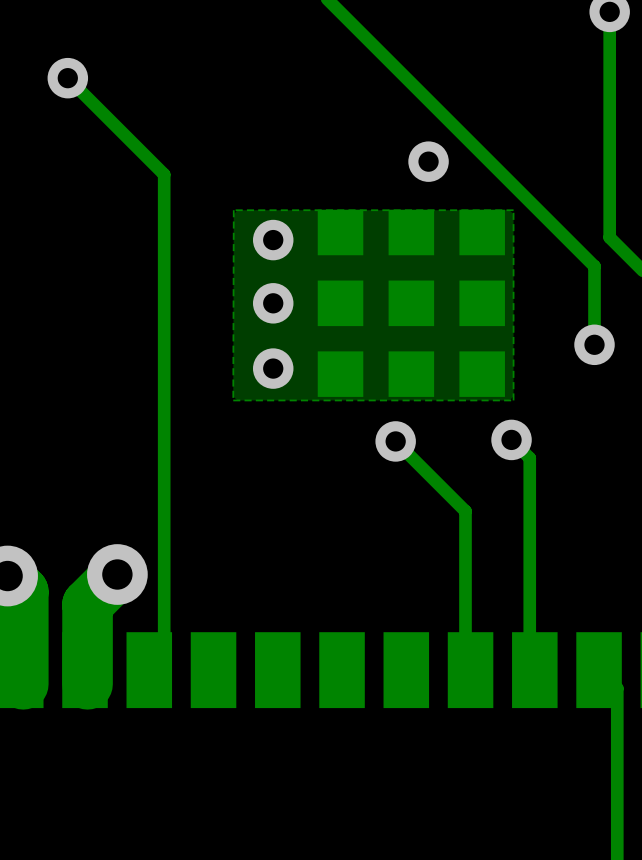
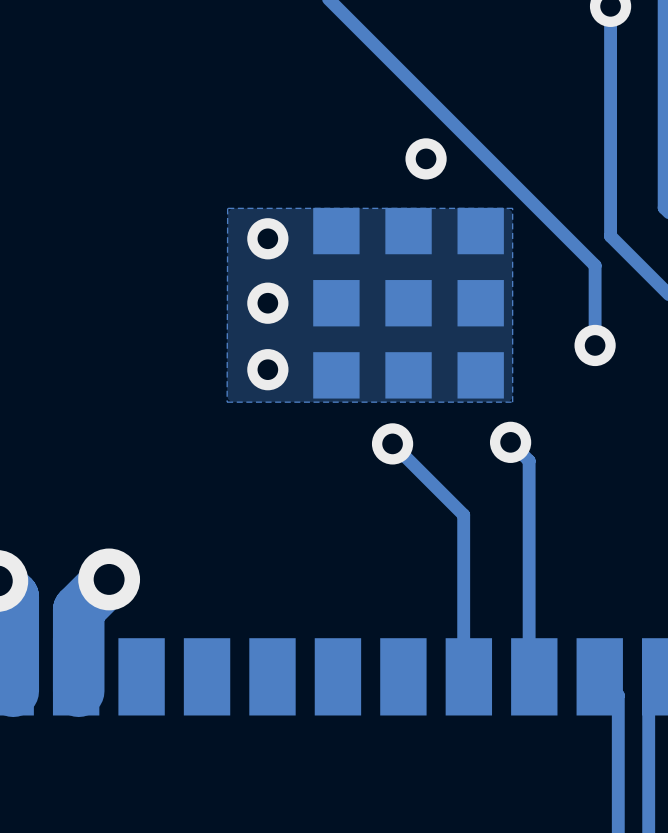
track: (67, 78) (164, 174) (164, 655) (149, 670) -> none
via: (67, 78) -> none

